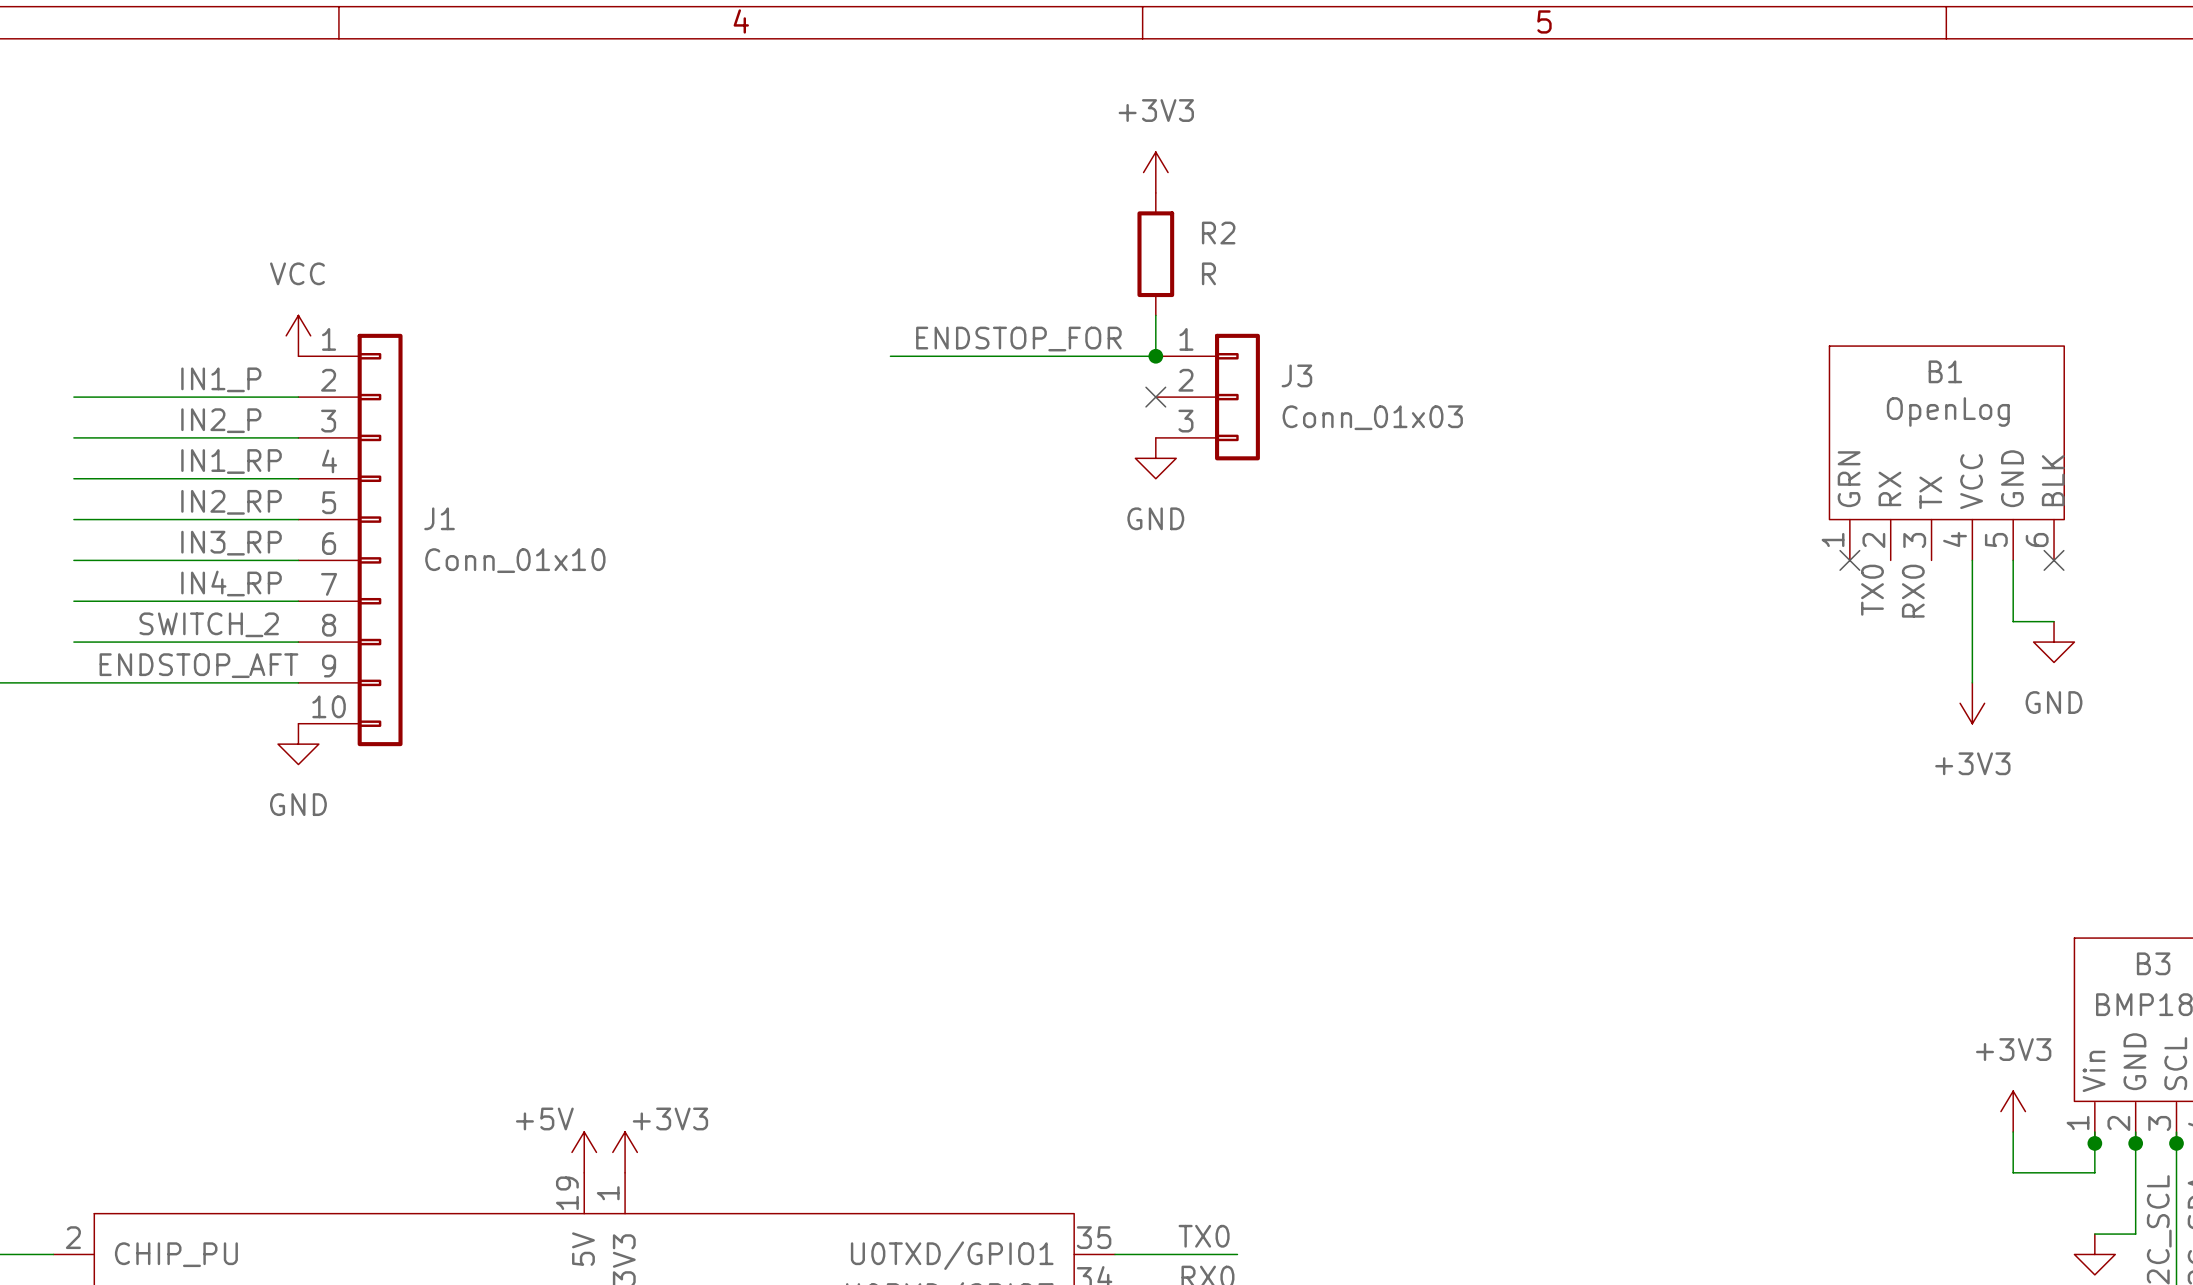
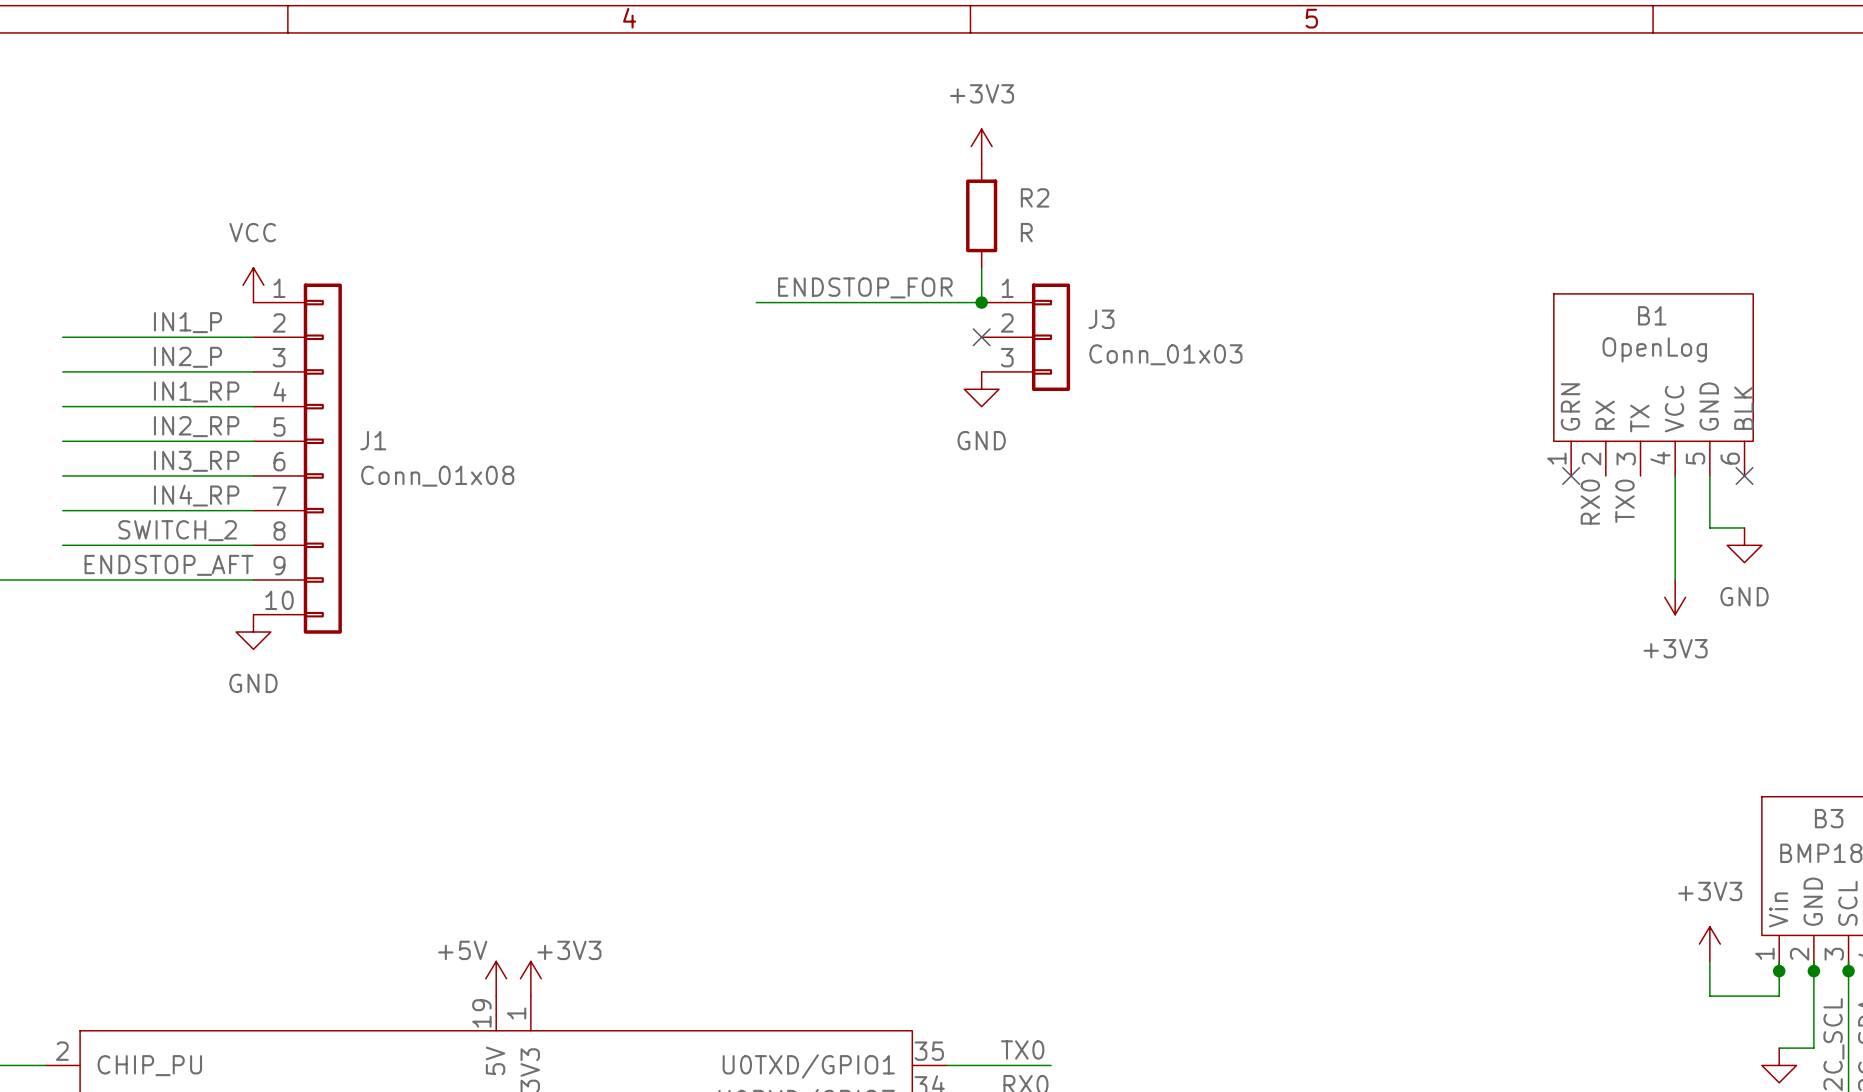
J1 value: Conn_01x10 (515, 560) -> Conn_01x08 (437, 476)
label: TX0 (1872, 590) -> RX0 (1590, 502)
label: RX0 (1913, 591) -> TX0 (1625, 501)

